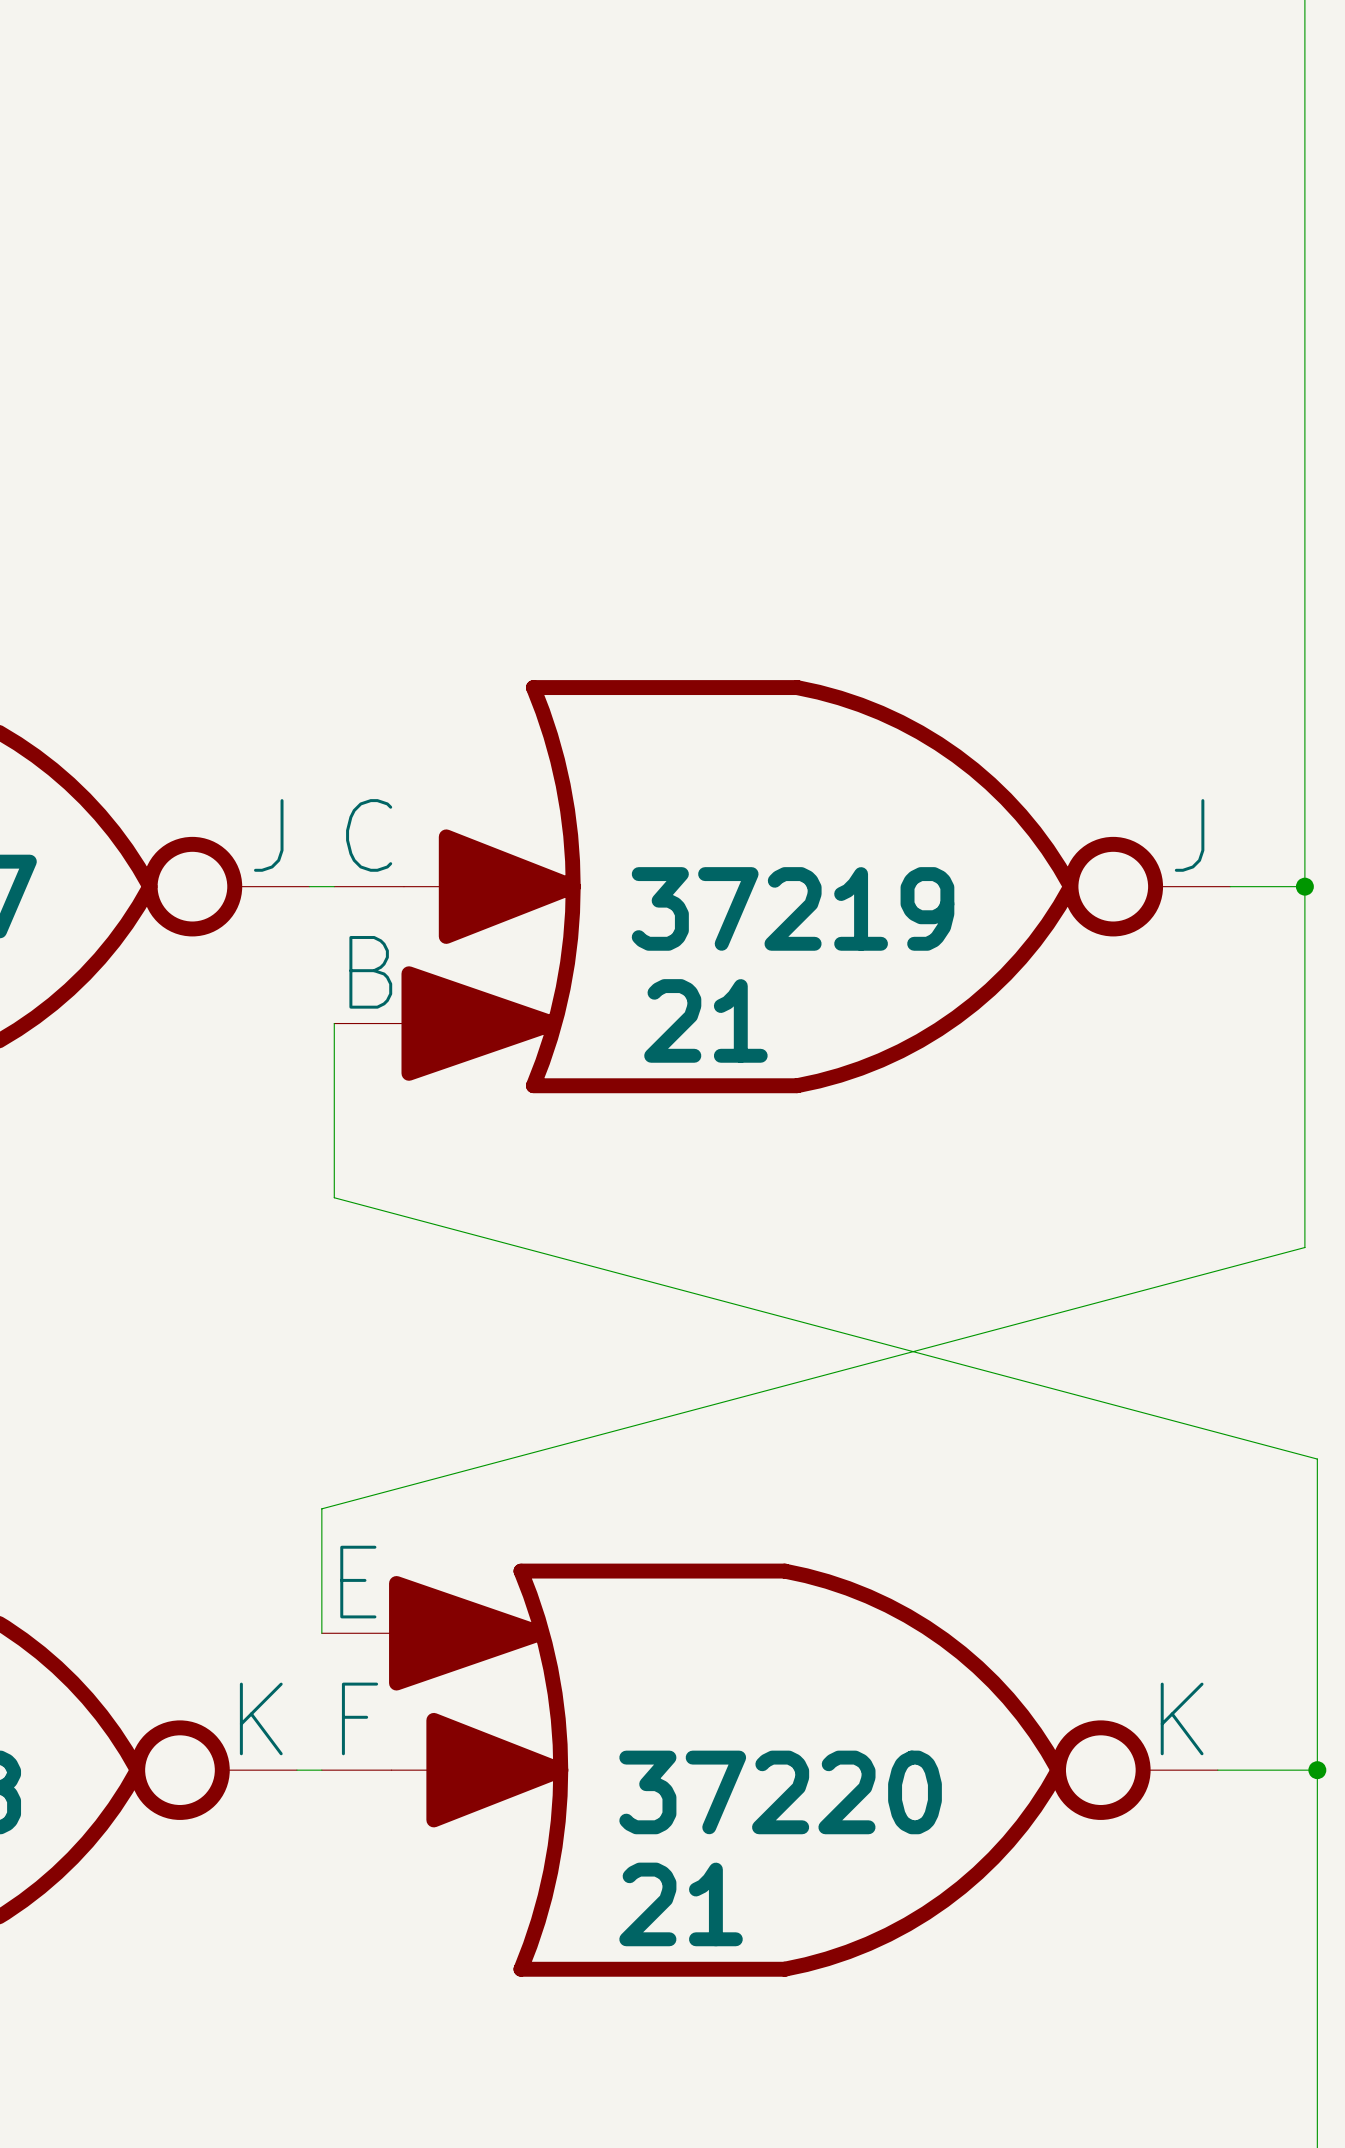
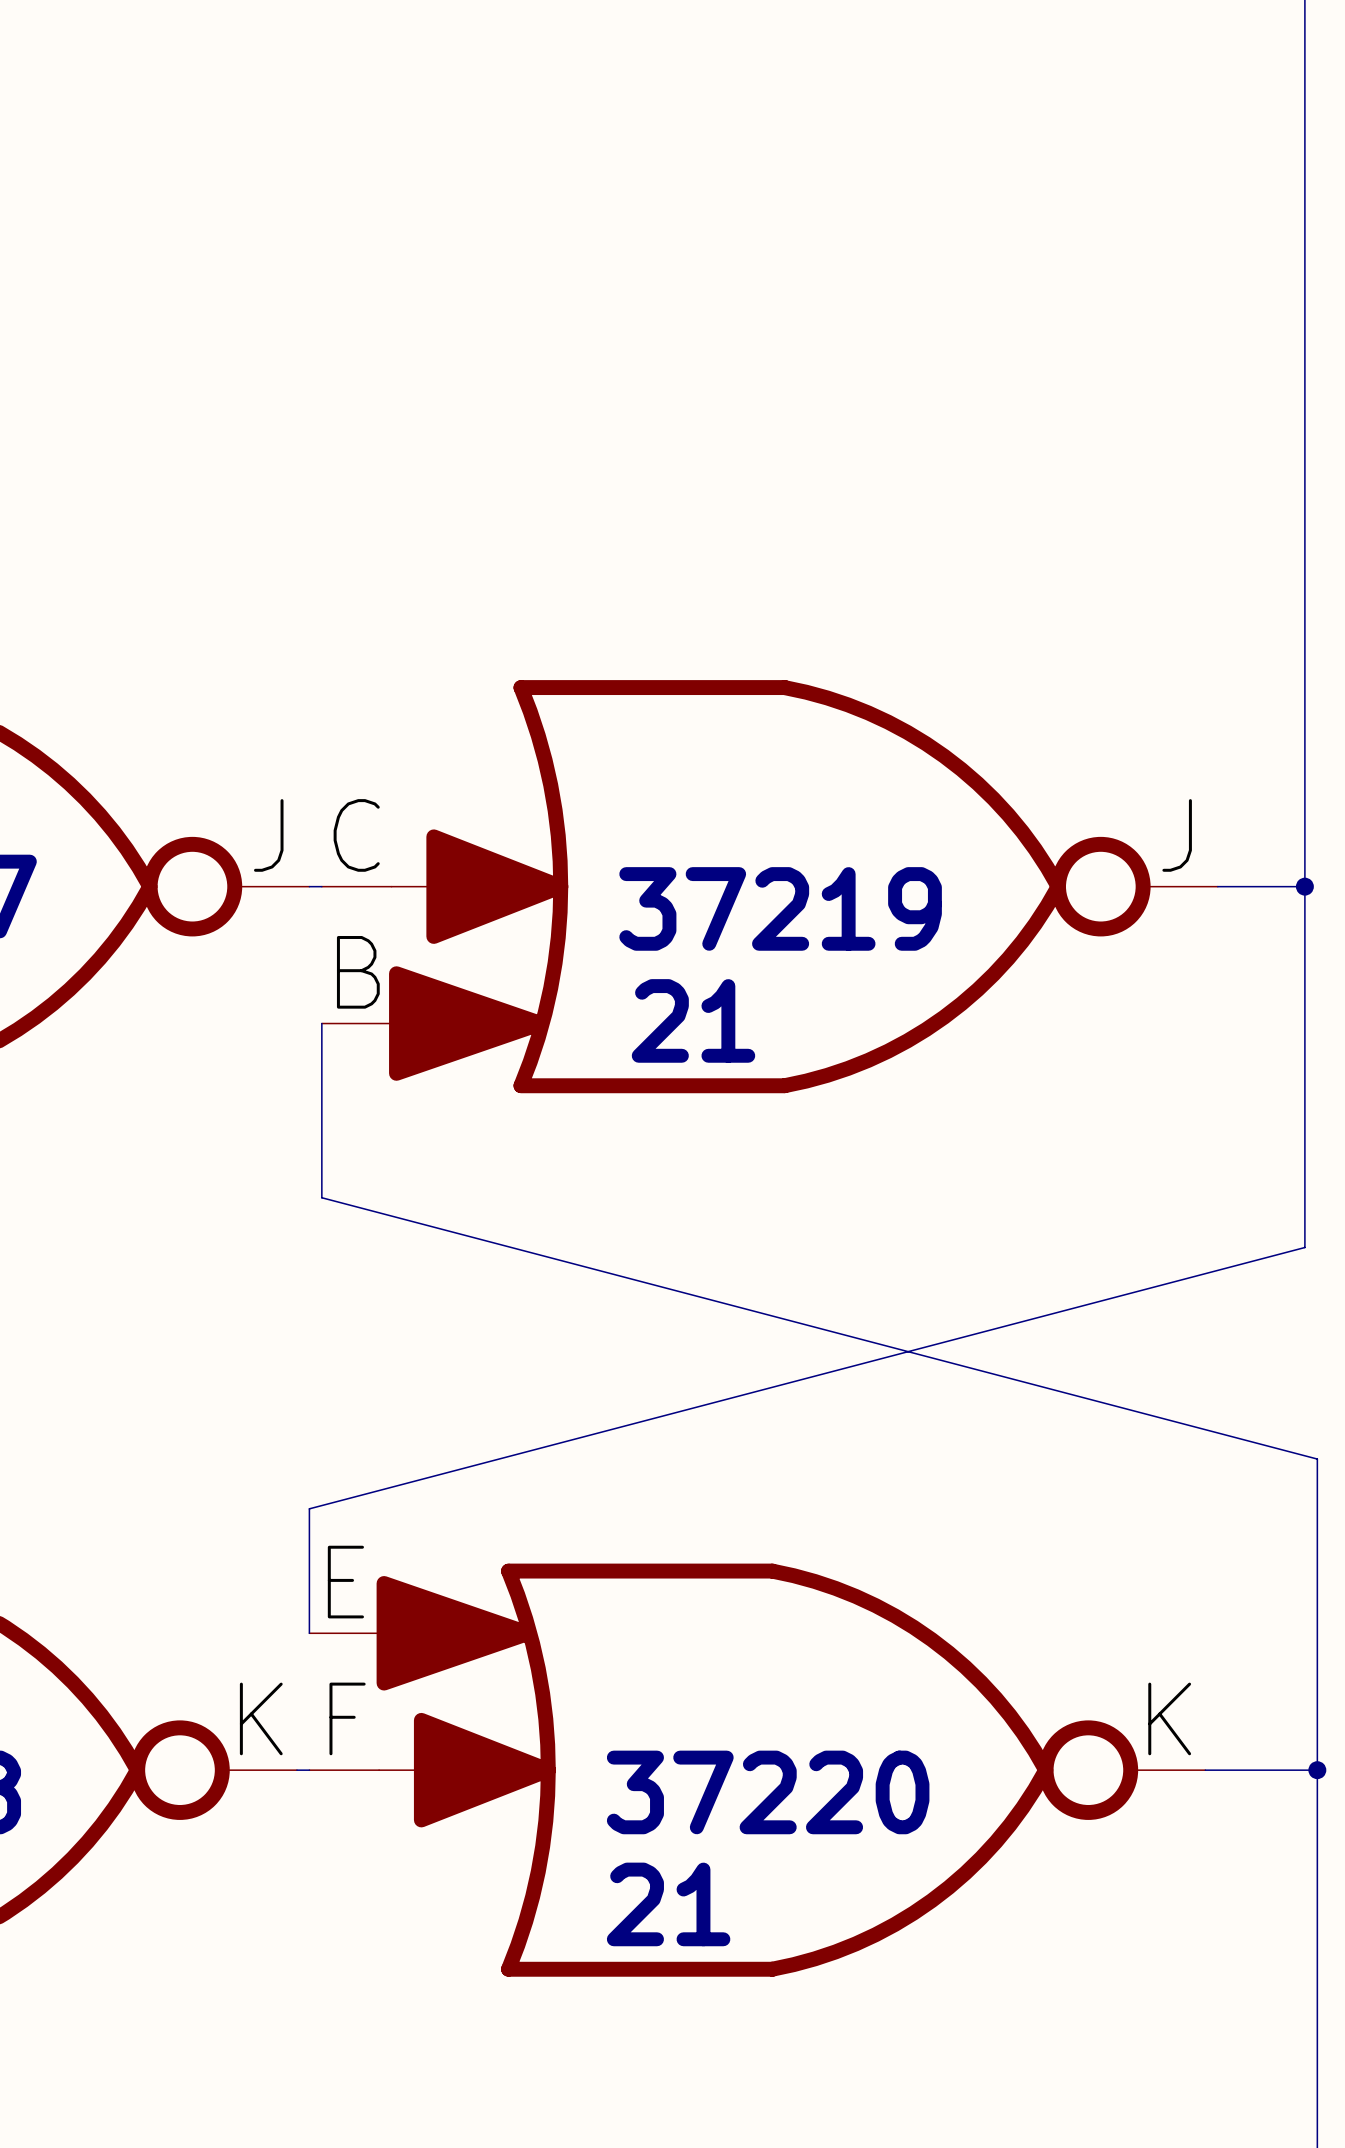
part position: (782, 886) -> (769, 886)
wire: (334, 1023) (334, 1197) (1317, 1459) -> (321, 1023) (321, 1197) (1317, 1459)
wire: (1304, 1247) (321, 1508) (321, 1633) -> (1304, 1247) (309, 1508) (309, 1633)
part position: (769, 1770) -> (757, 1770)

